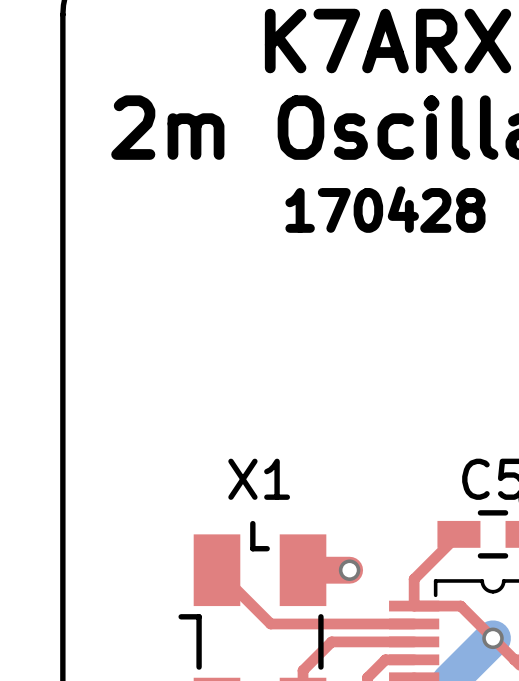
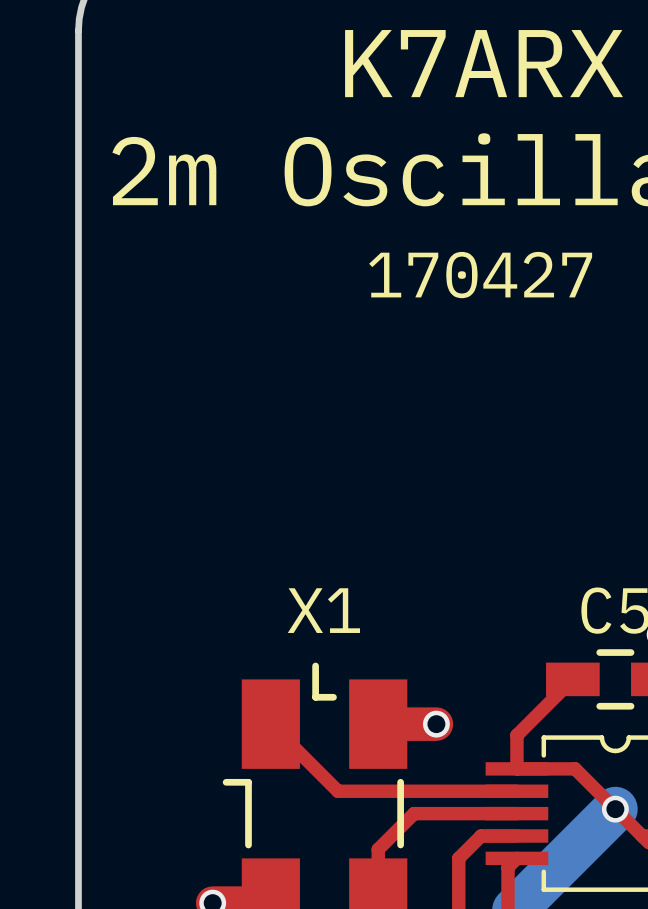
text: 170428 (385, 209) -> 170427 (480, 275)

